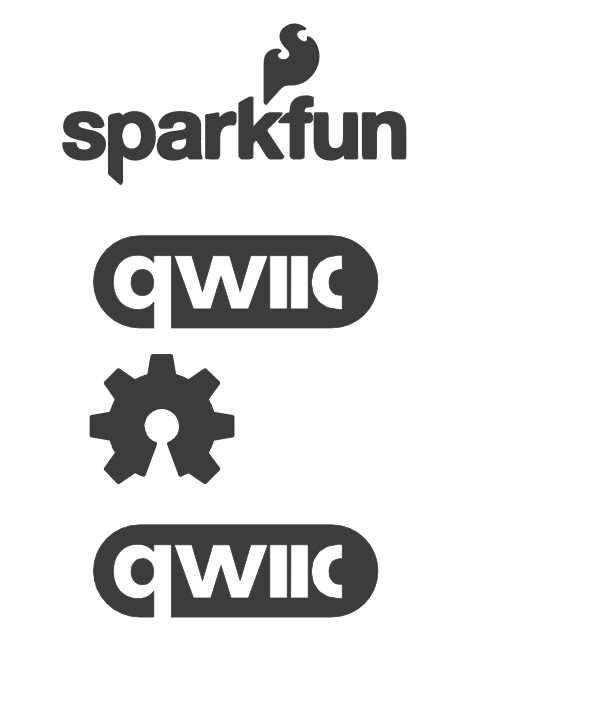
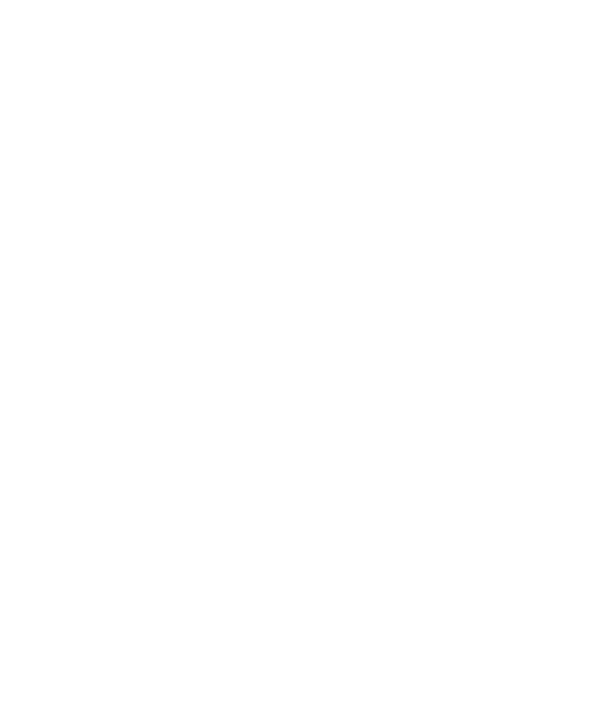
drawing: [62, 23, 407, 618] -> none

